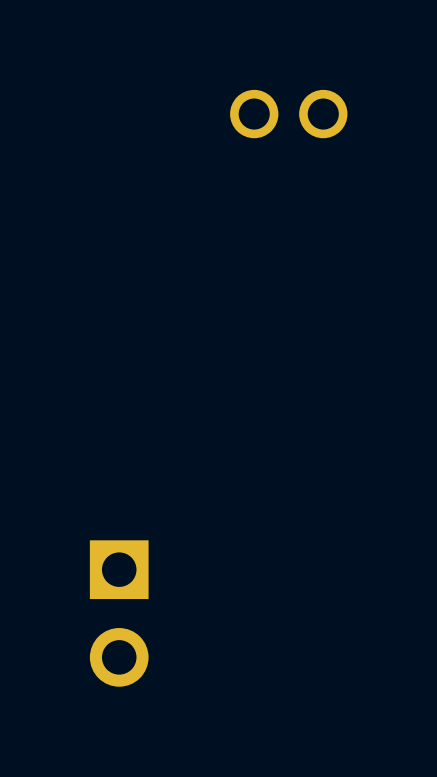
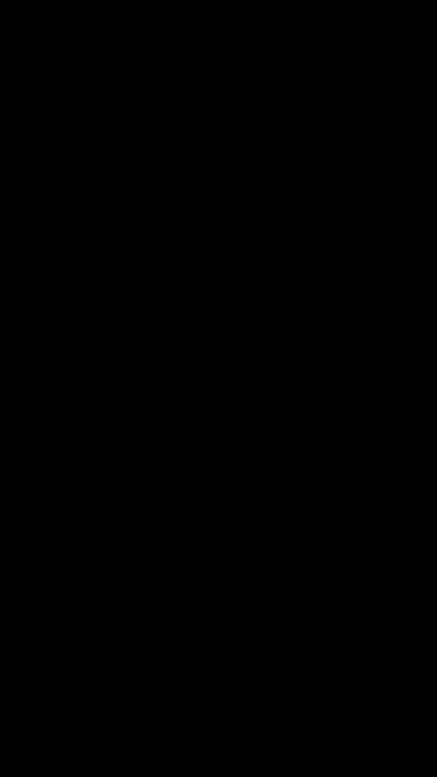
part: (288, 114) -> none
part: (119, 613) -> none

